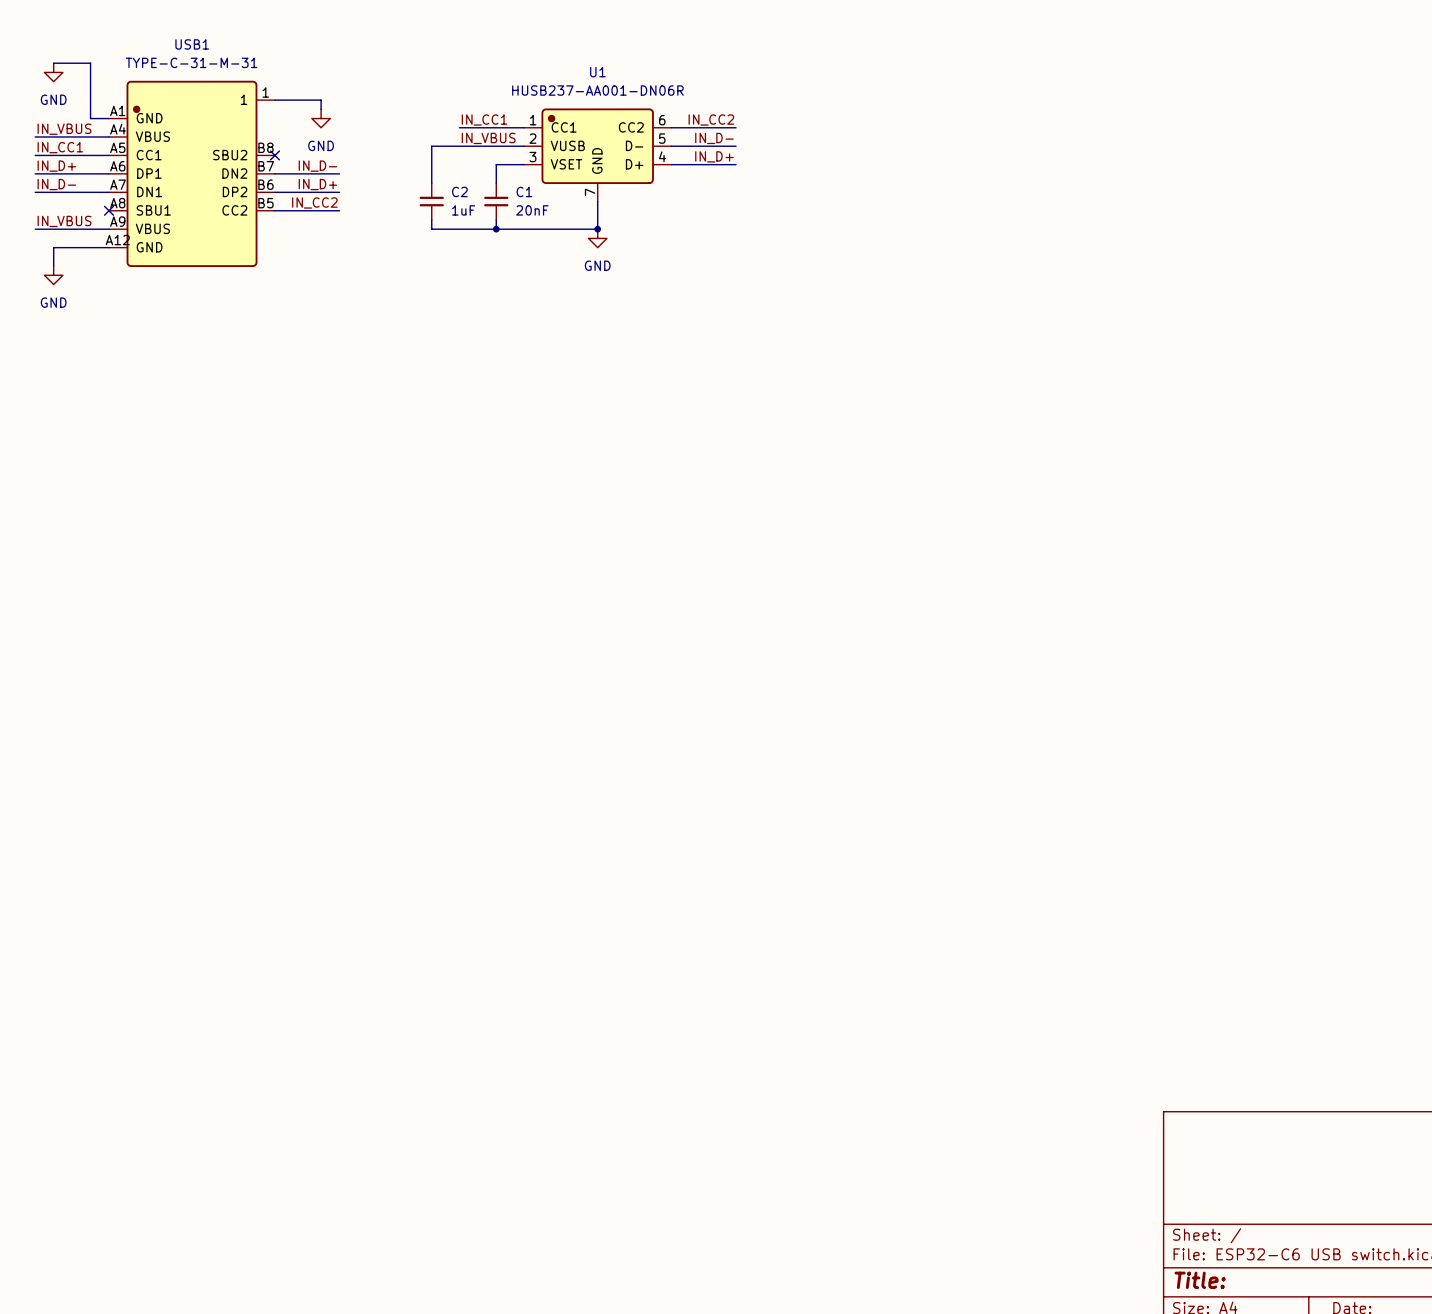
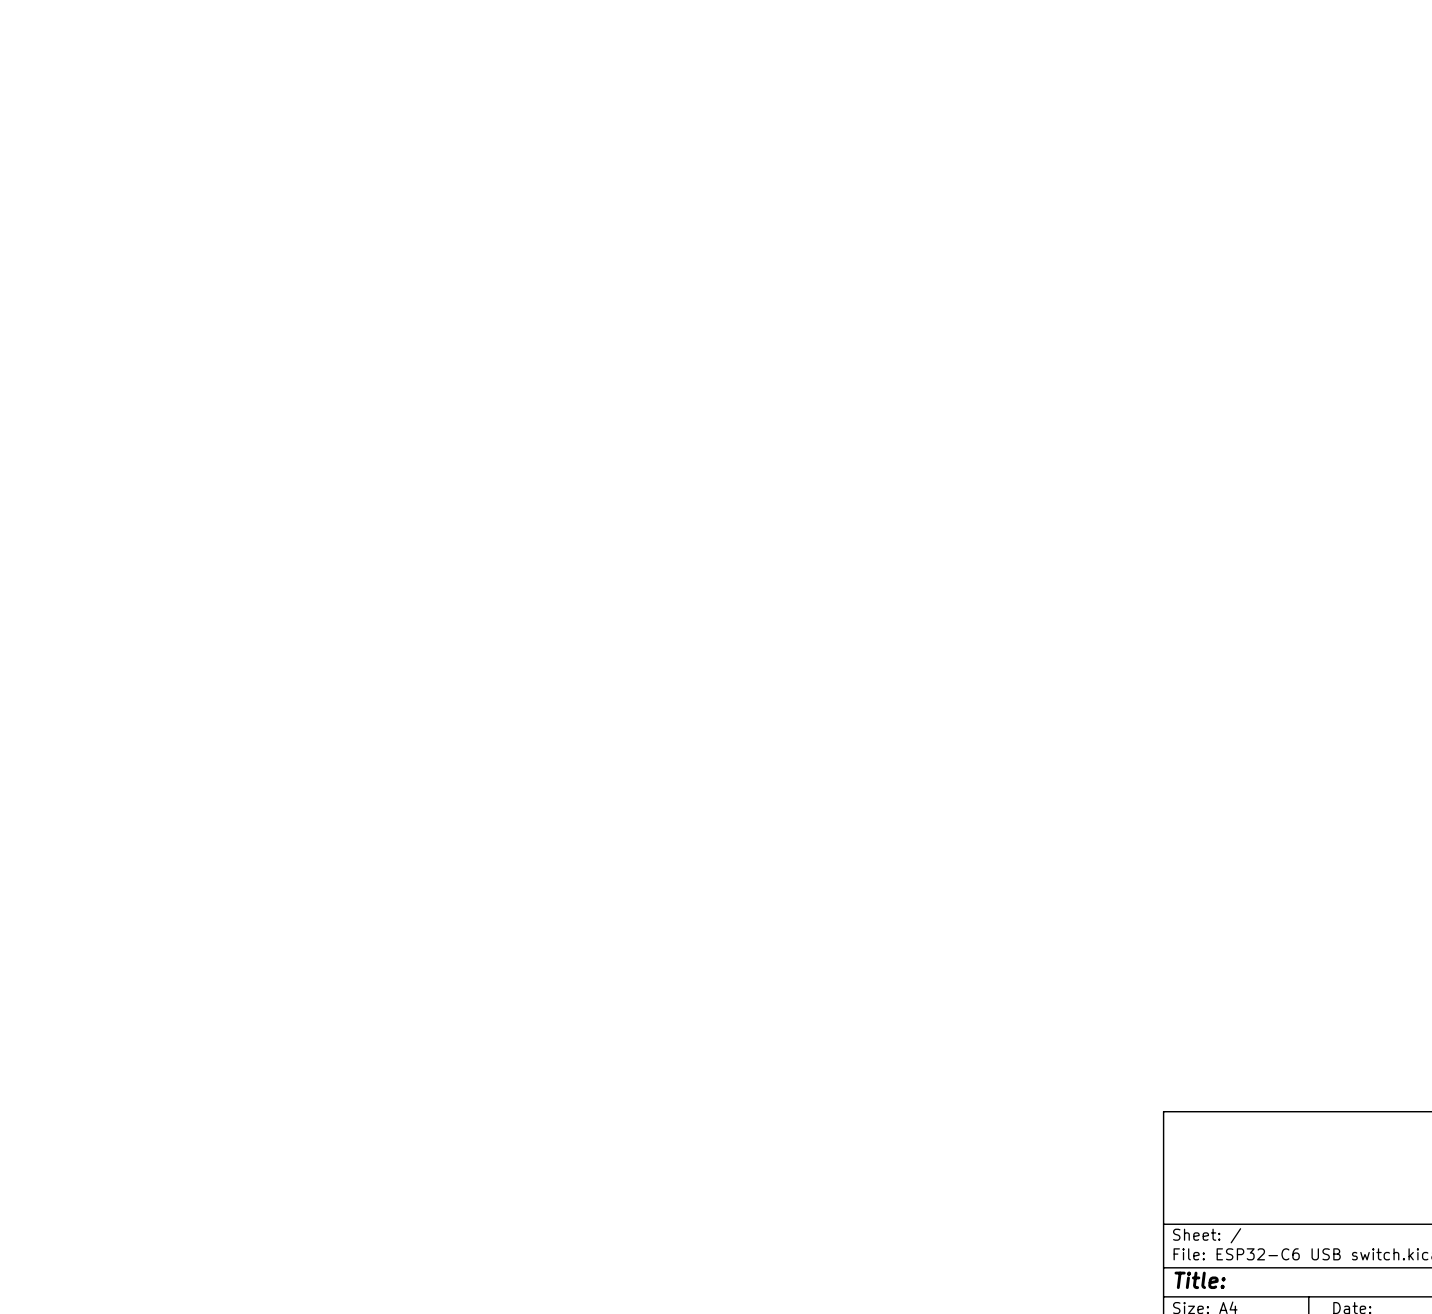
wire: (53, 63) (90, 63) (90, 118) (109, 118) -> none
power symbol: GND (53, 72) -> none
wire: (274, 100) (321, 100) (321, 109) -> none
power symbol: GND (321, 118) -> none
label: IN_CC1 (484, 119) -> none
label: IN_CC2 (711, 119) -> none
wire: (459, 127) (523, 127) -> none
wire: (671, 127) (736, 127) -> none
label: IN_VBUS (64, 129) -> none
wire: (35, 136) (109, 136) -> none
label: IN_VBUS (488, 138) -> none
label: IN_D- (714, 138) -> none
wire: (523, 146) (431, 146) (431, 183) -> none
wire: (671, 146) (736, 146) -> none
label: IN_CC1 (60, 147) -> none
U1: HUSB237-AA001-DN06R (597, 154) -> none
wire: (35, 155) (109, 155) -> none
no-connect mark: (274, 155) -> none
label: IN_D+ (714, 156) -> none
wire: (523, 164) (496, 164) (496, 183) -> none
wire: (671, 164) (736, 164) -> none
label: IN_D+ (56, 166) -> none
label: IN_D- (317, 166) -> none
wire: (35, 173) (109, 173) -> none
USB1: TYPE-C-31-M-31 (191, 173) -> none
wire: (274, 173) (339, 173) -> none
label: IN_D- (56, 184) -> none
label: IN_D+ (317, 184) -> none
wire: (35, 192) (109, 192) -> none
wire: (274, 192) (339, 192) -> none
C2: 1uF (431, 201) -> none
C1: 20nF (496, 201) -> none
wire: (597, 201) (597, 229) (431, 229) (431, 219) -> none
label: IN_CC2 (314, 202) -> none
no-connect mark: (109, 210) -> none
wire: (274, 210) (339, 210) -> none
wire: (496, 219) (496, 229) -> none
label: IN_VBUS (64, 221) -> none
wire: (35, 229) (109, 229) -> none
junction: (496, 229) -> none
junction: (597, 229) -> none
power symbol: GND (597, 238) -> none
wire: (109, 247) (53, 247) (53, 266) -> none
power symbol: GND (53, 275) -> none

